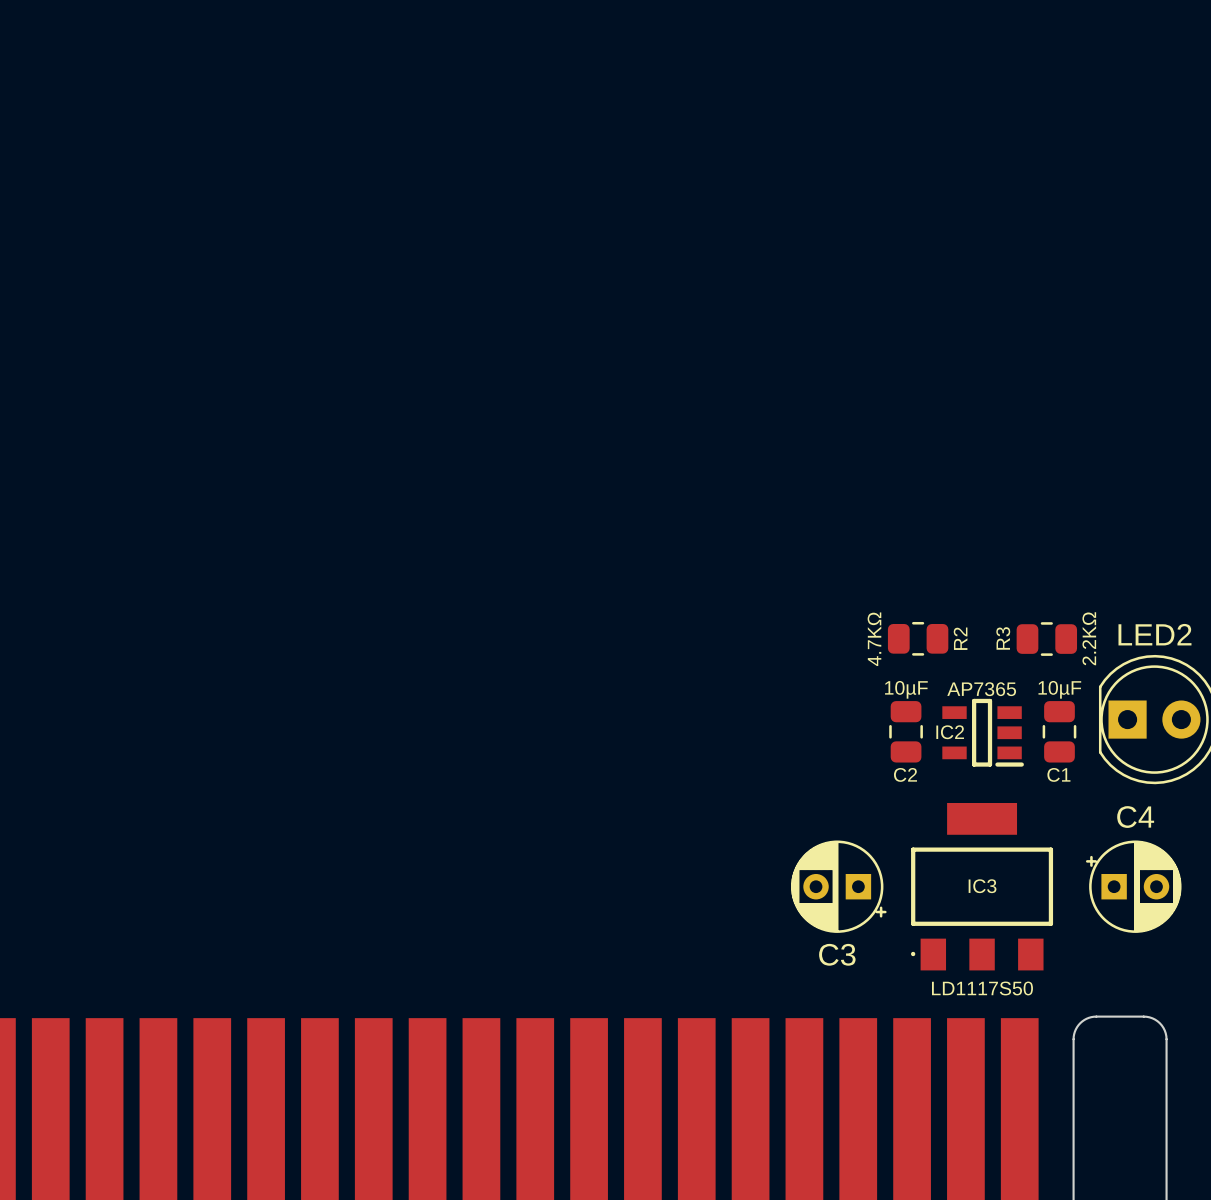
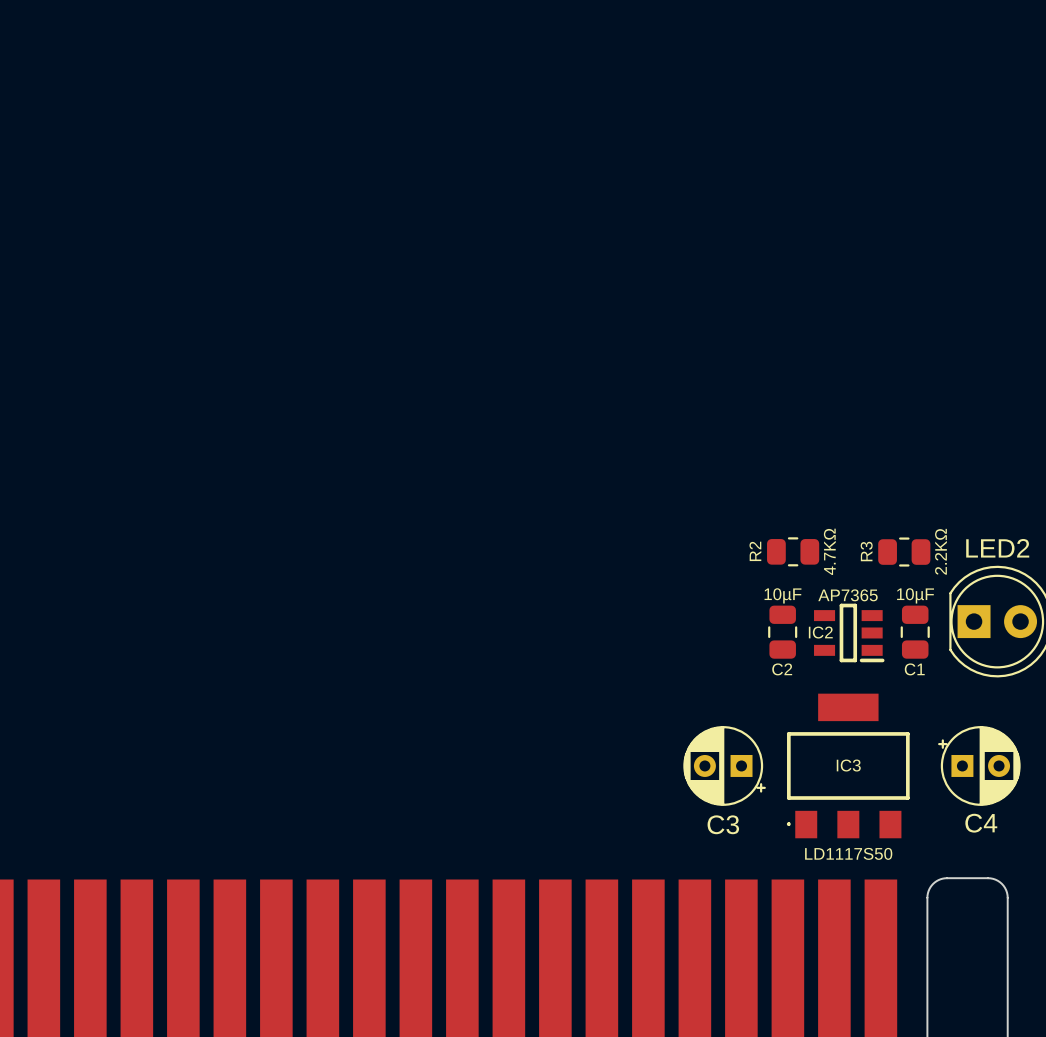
R2 name position: R2 (960, 638) -> R2 (755, 551)
R2 value position: 4.7KΩ (874, 639) -> 4.7KΩ (829, 551)
C4 name position: C4 (1135, 817) -> C4 (981, 823)

